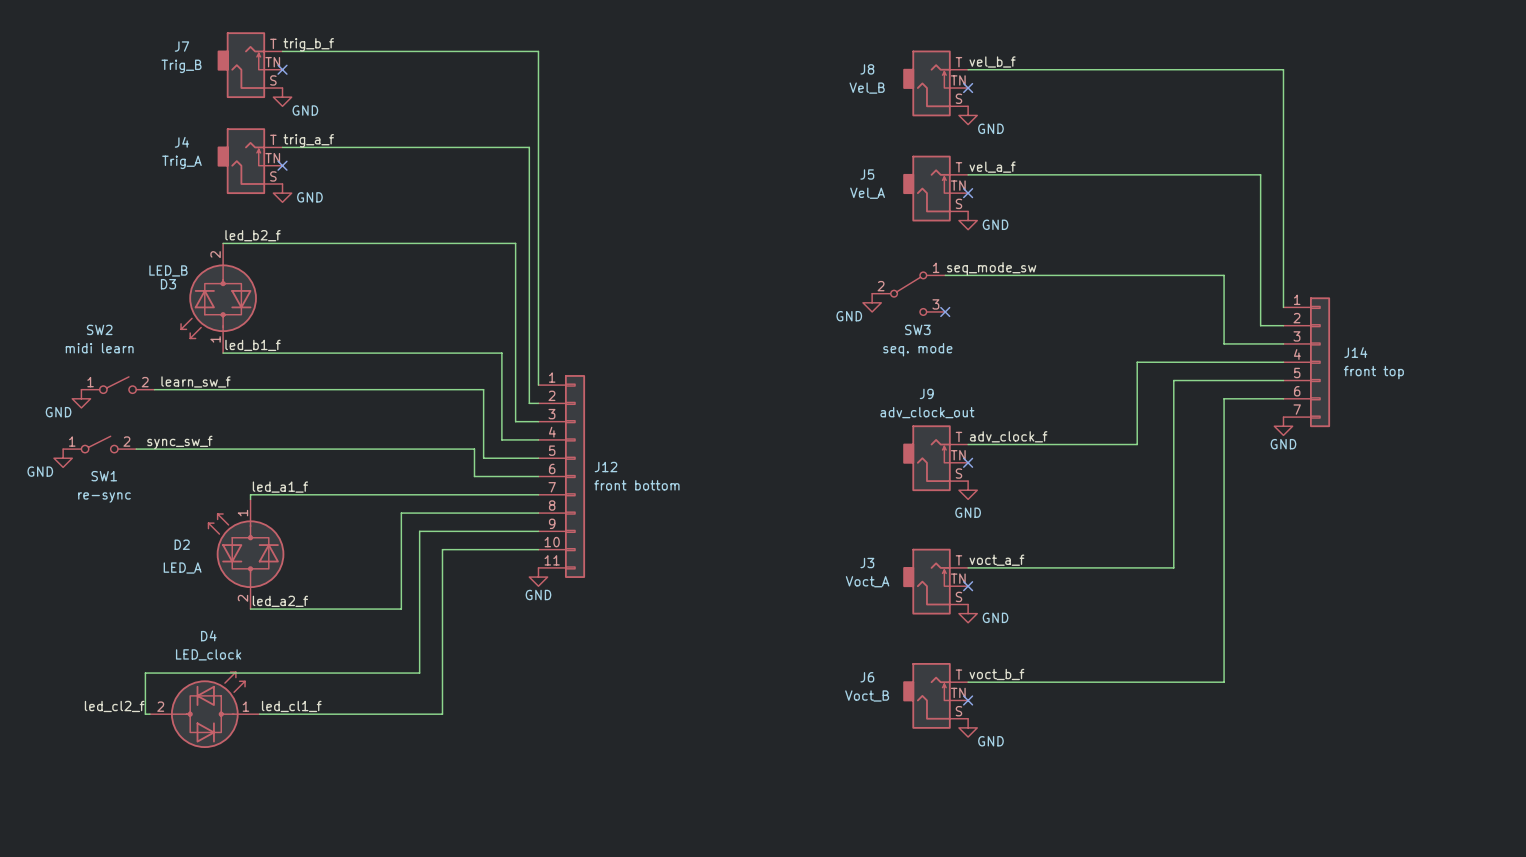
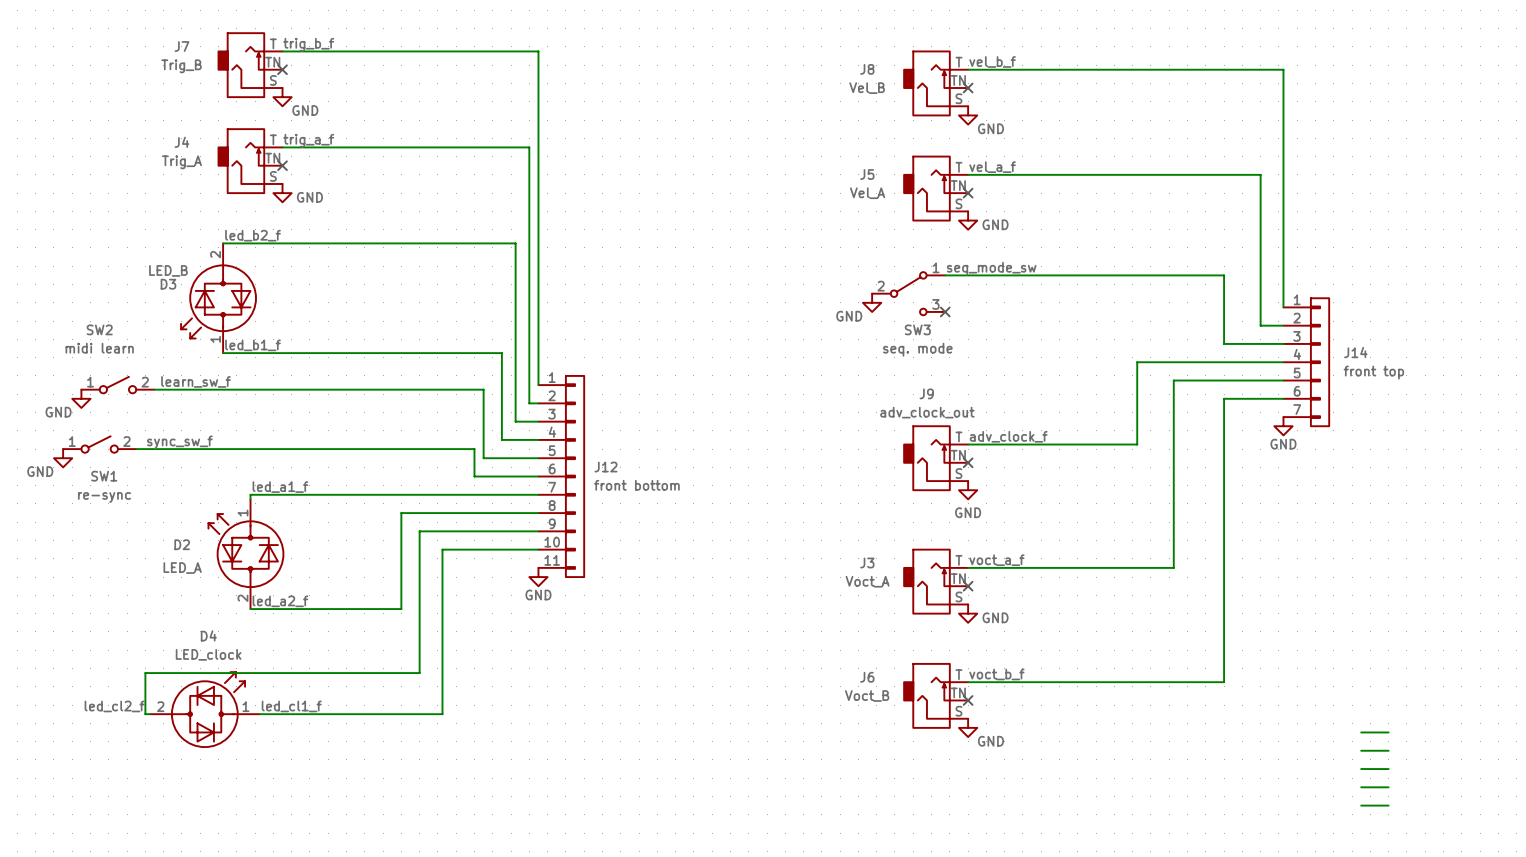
wire: none -> (1361, 732) (1388, 732)
wire: none -> (1361, 750) (1388, 750)
wire: none -> (1361, 769) (1388, 769)
wire: none -> (1361, 787) (1388, 787)
wire: none -> (1361, 805) (1388, 805)

